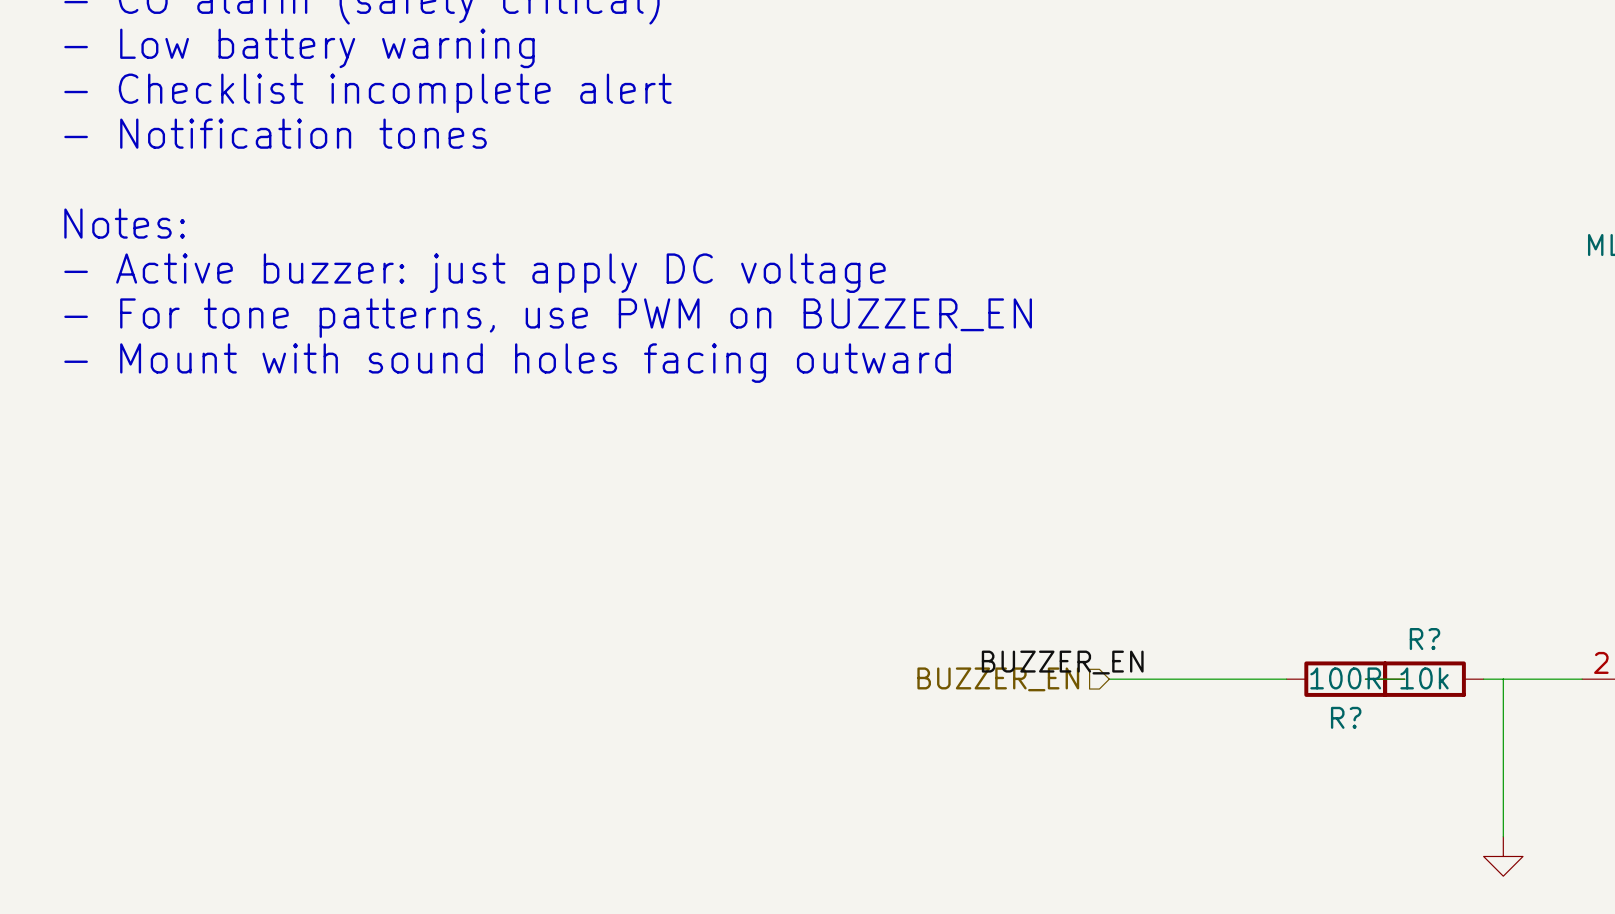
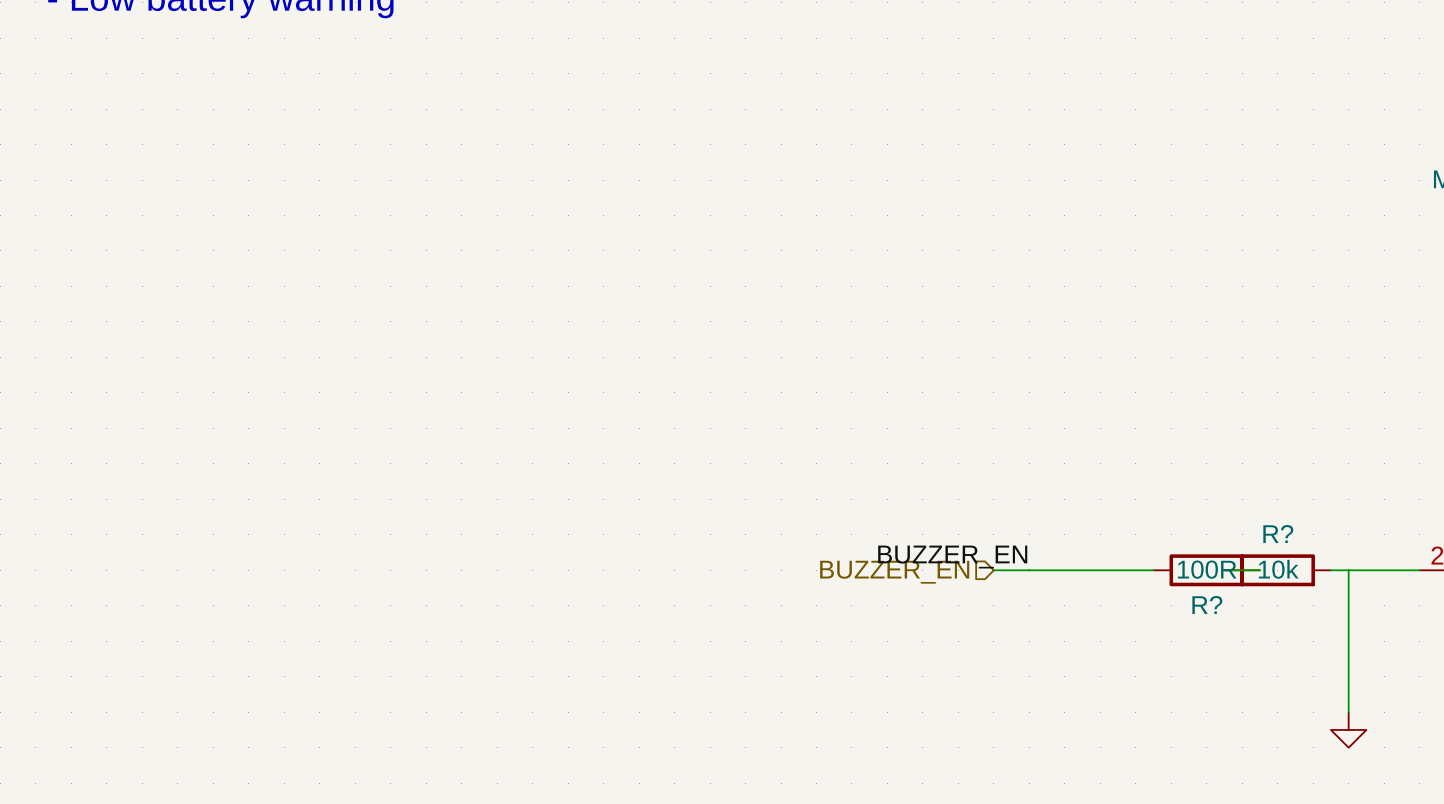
text: - Checklist incomplete alert (367, 93) -> none
text: - Notification tones (275, 133) -> none
text: Notes: (124, 223) -> none
text: - Active buzzer: just apply DC voltage (474, 273) -> none
text: - For tone patterns, use PWM on BUZZER_EN (548, 318) -> none
text: - Mount with sound holes facing outward (507, 363) -> none

